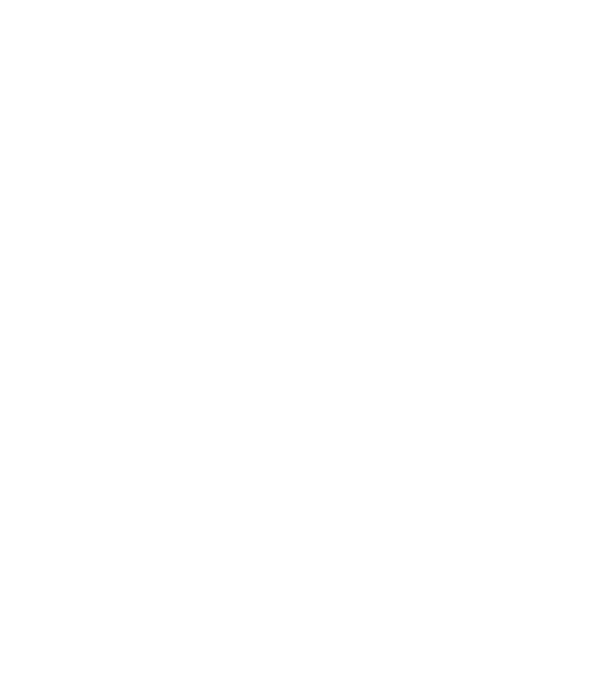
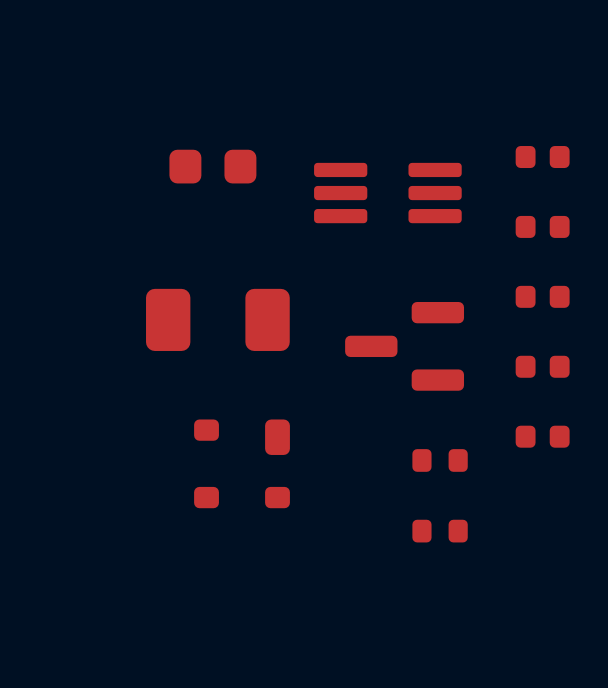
part: none -> (542, 157)
part: none -> (212, 166)
part: none -> (387, 193)
part: none -> (542, 226)
part: none -> (542, 296)
part: none -> (217, 319)
part: none -> (404, 346)
part: none -> (542, 366)
part: none -> (542, 436)
part: none -> (440, 460)
part: none -> (242, 463)
part: none -> (440, 531)

